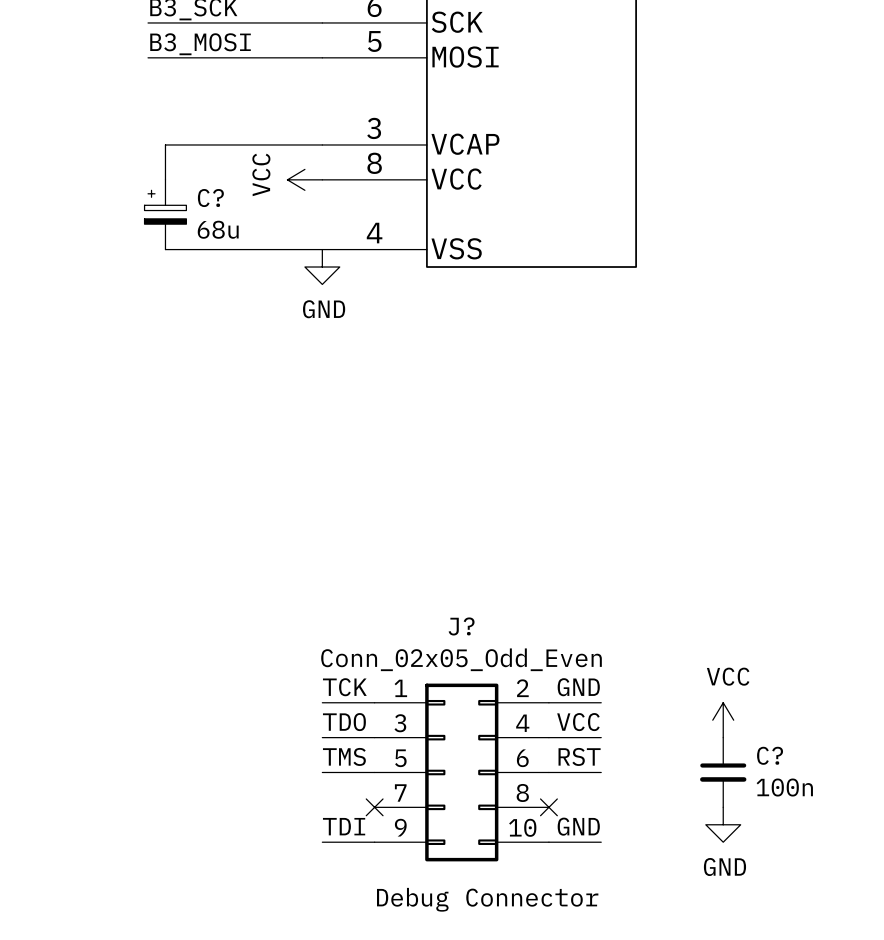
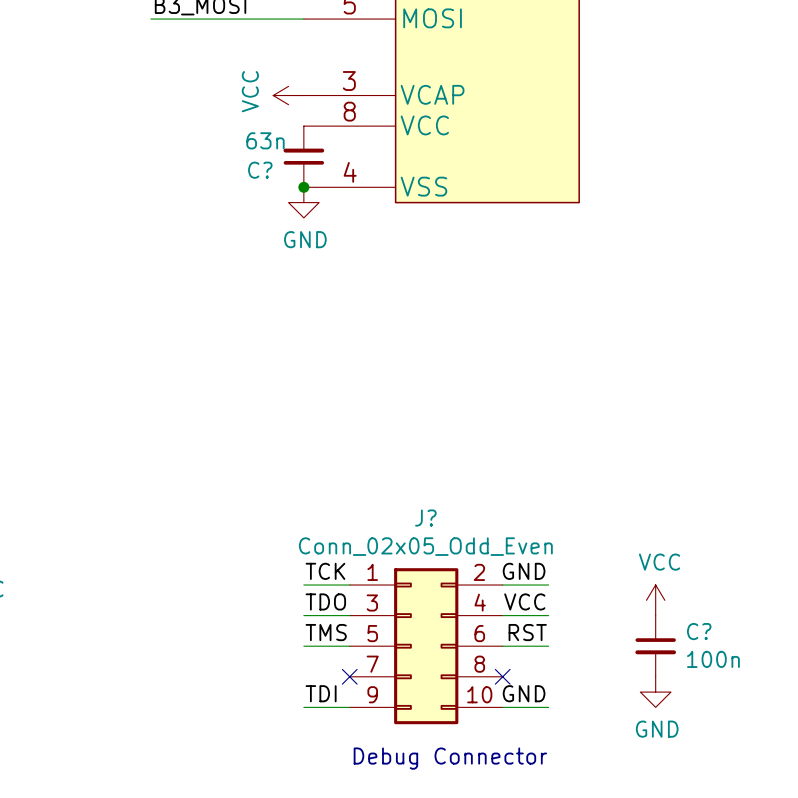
wire: (322, 144) (165, 144) (165, 179) -> none
power symbol position: VCC (304, 179) -> VCC (288, 95)
C?: 68u (165, 214) -> none
C?: none -> 63n (303, 156)
wire: (165, 249) (322, 249) -> none
junction: none -> (303, 187)

